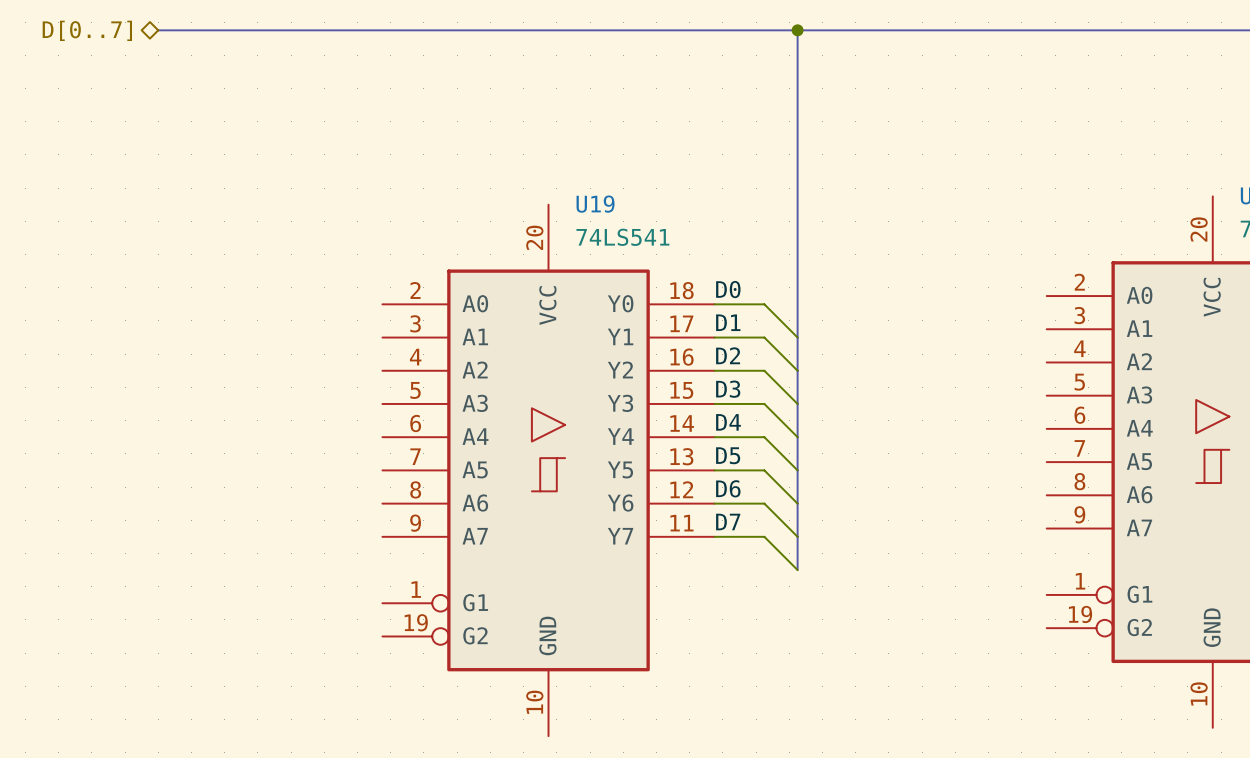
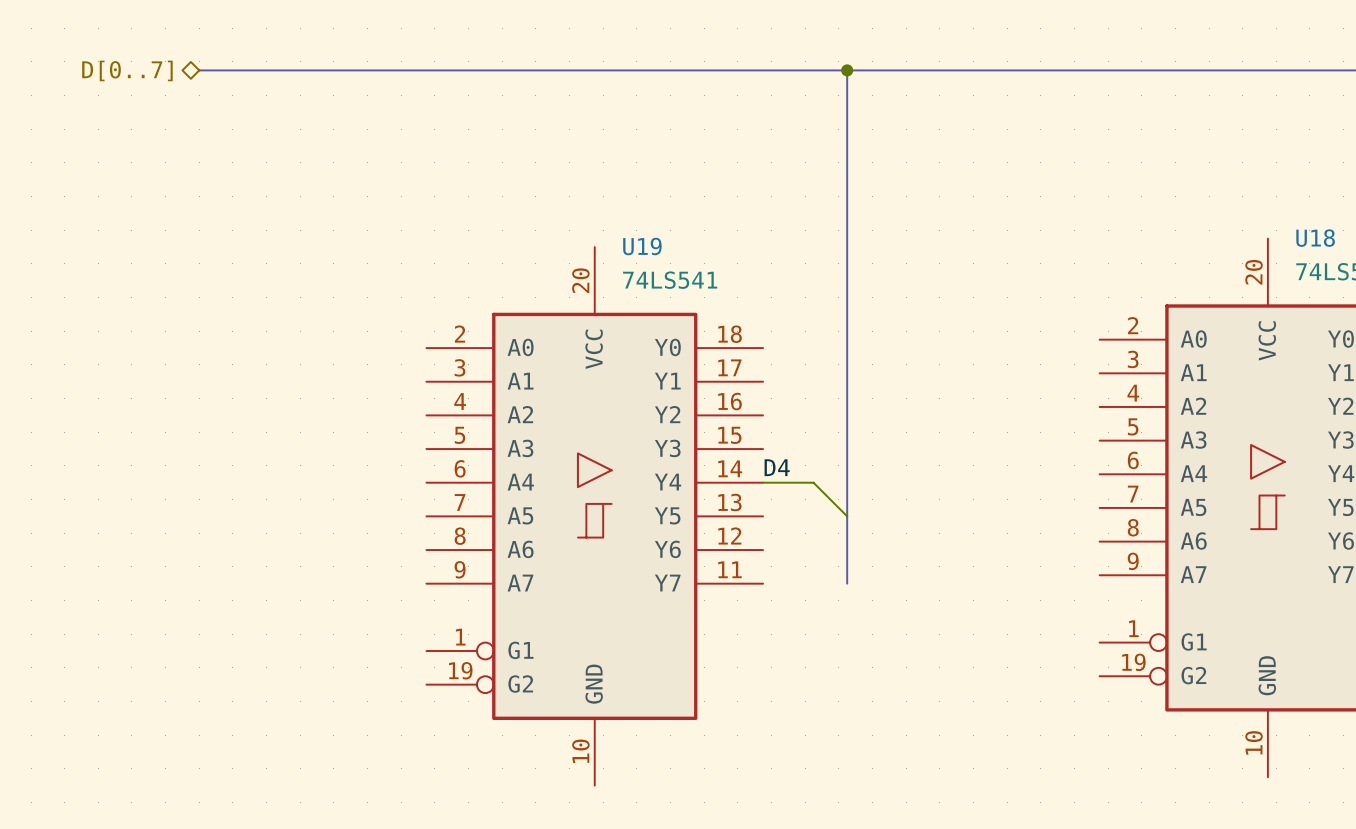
label: D0 (728, 289) -> none
wire: (714, 304) (764, 304) (797, 337) -> none
label: D1 (728, 322) -> none
wire: (714, 337) (764, 337) (797, 370) -> none
label: D2 (728, 355) -> none
wire: (714, 370) (764, 370) (797, 403) -> none
label: D3 (728, 389) -> none
wire: (714, 403) (764, 403) (797, 437) -> none
label: D5 (728, 455) -> none
wire: (714, 470) (764, 470) (797, 503) -> none
label: D6 (728, 488) -> none
wire: (714, 503) (764, 503) (797, 536) -> none
label: D7 (728, 522) -> none
wire: (714, 536) (764, 536) (797, 570) -> none
bus: (797, 536) (797, 570) -> none

